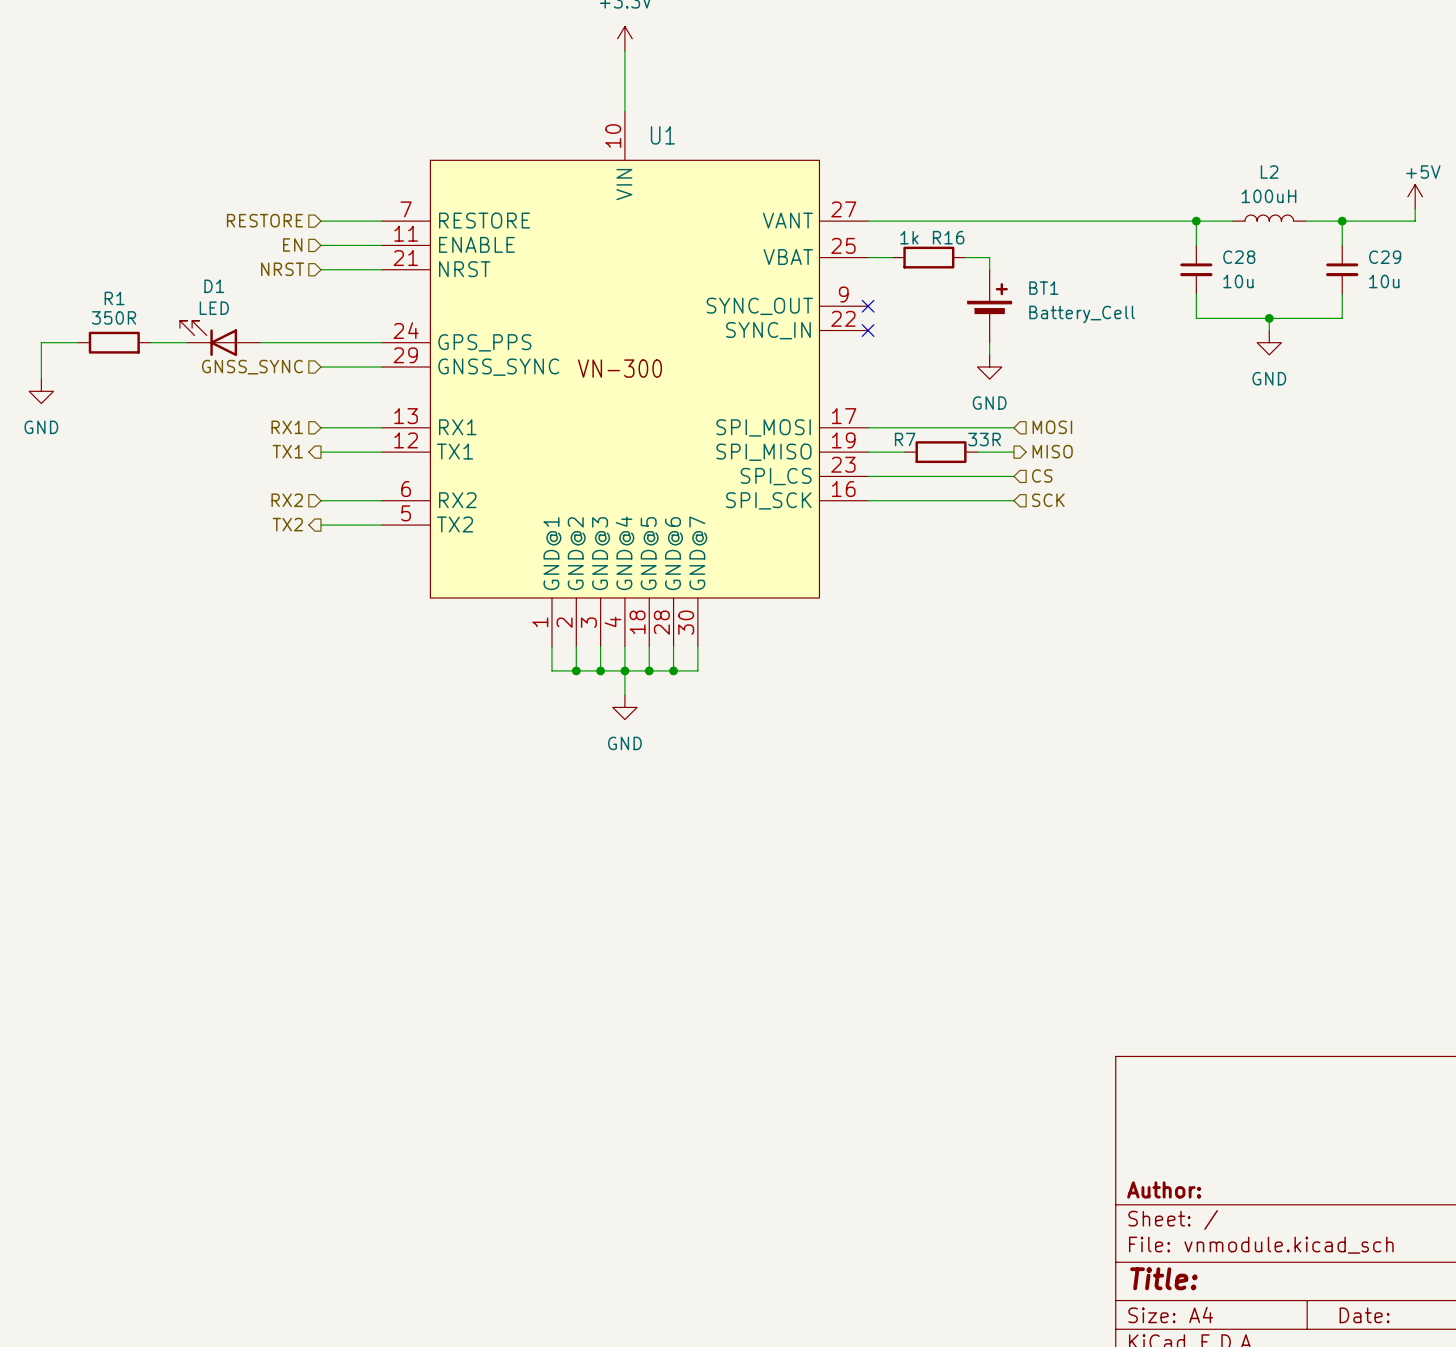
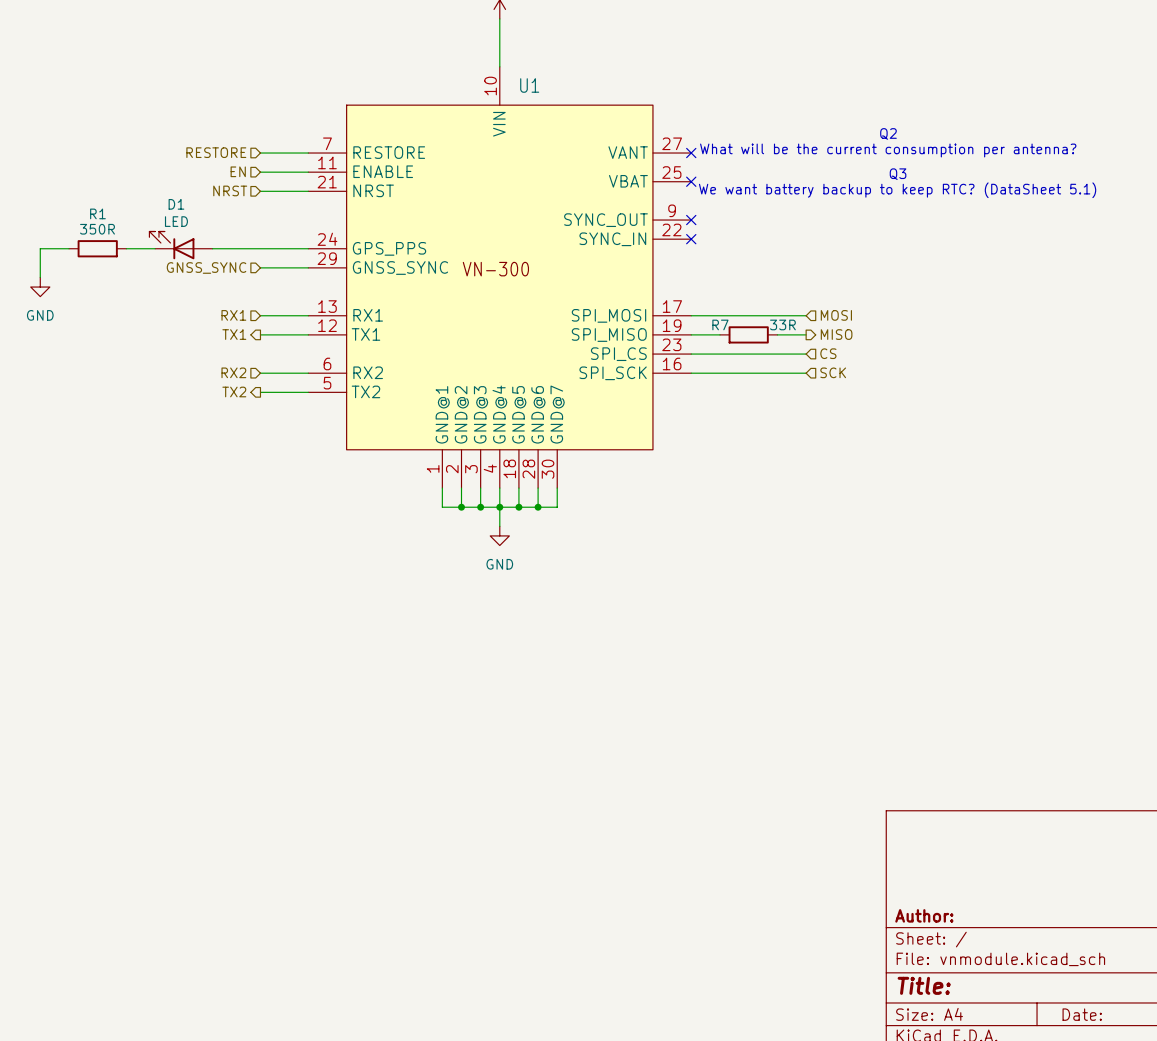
text: none -> Q2 (888, 133)
power symbol: +5V (1415, 196) -> none
wire: (1415, 208) (1415, 221) (1305, 221) -> none
text: none -> What will be the current consumption per antenna? (888, 150)
L2: 100uH (1269, 218) -> none
wire: (868, 221) (1232, 221) -> none
no-connect mark: none -> (691, 153)
wire: (1196, 221) (1196, 245) -> none
junction: (1196, 221) -> none
wire: (1342, 221) (1342, 245) -> none
junction: (1342, 221) -> none
text: none -> Q3 (898, 174)
wire: (868, 257) (892, 257) -> none
no-connect mark: none -> (691, 181)
R16: 1k (928, 257) -> none
wire: (965, 257) (989, 257) (989, 269) -> none
text: none -> We want battery backup to keep RTC? (DataSheet 5.1) (897, 190)
C28: 10u (1196, 269) -> none
C29: 10u (1342, 269) -> none
wire: (1196, 294) (1196, 318) (1342, 318) (1342, 294) -> none
BT1: Battery_Cell (989, 306) -> none
wire: (1269, 318) (1269, 330) -> none
junction: (1269, 318) -> none
wire: (989, 342) (989, 354) -> none
power symbol: GND (1269, 342) -> none
power symbol: GND (989, 367) -> none

